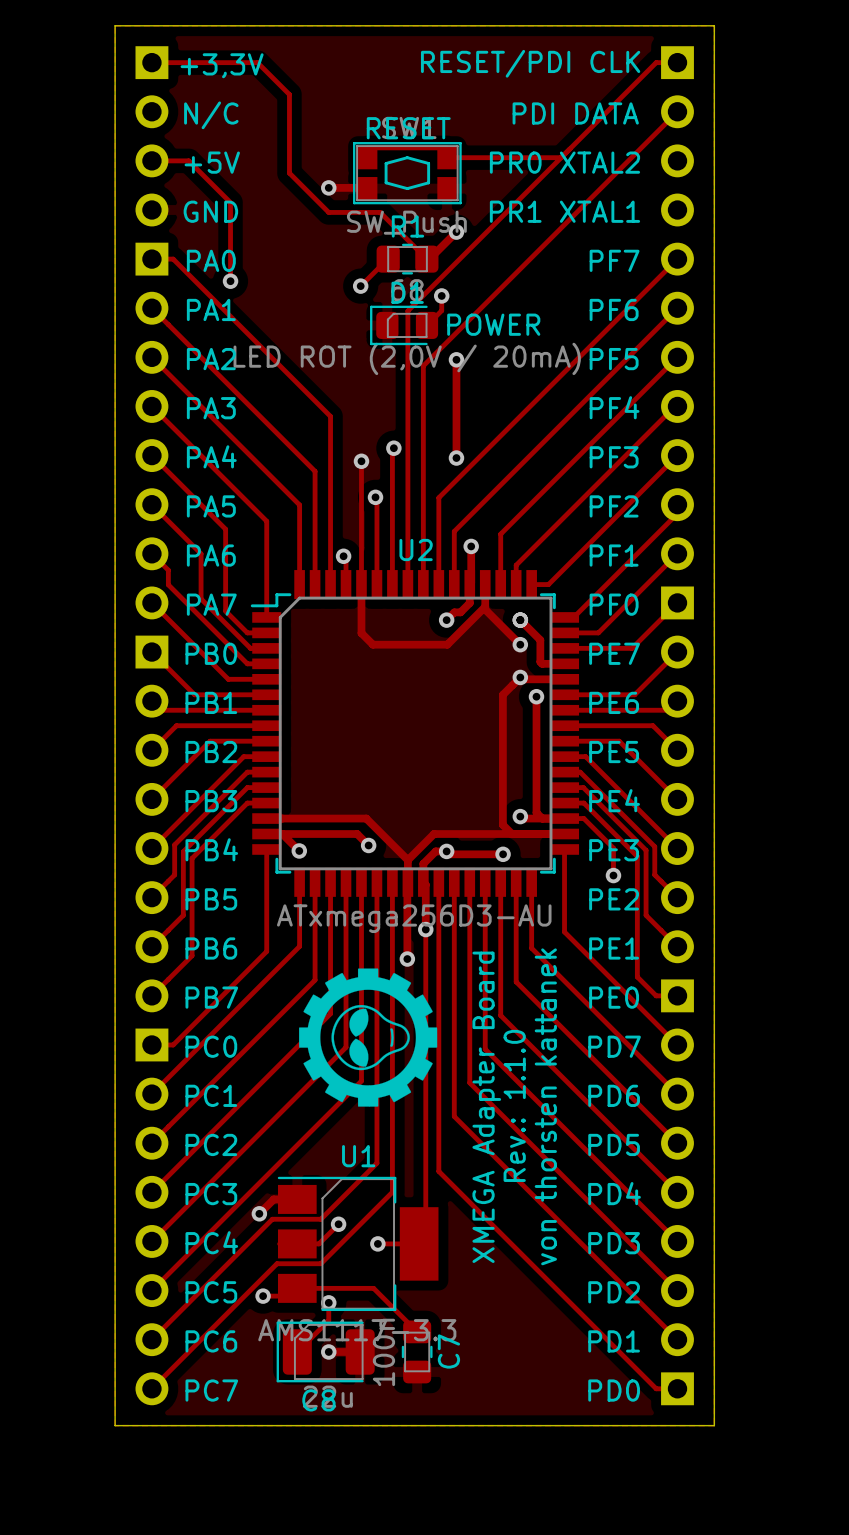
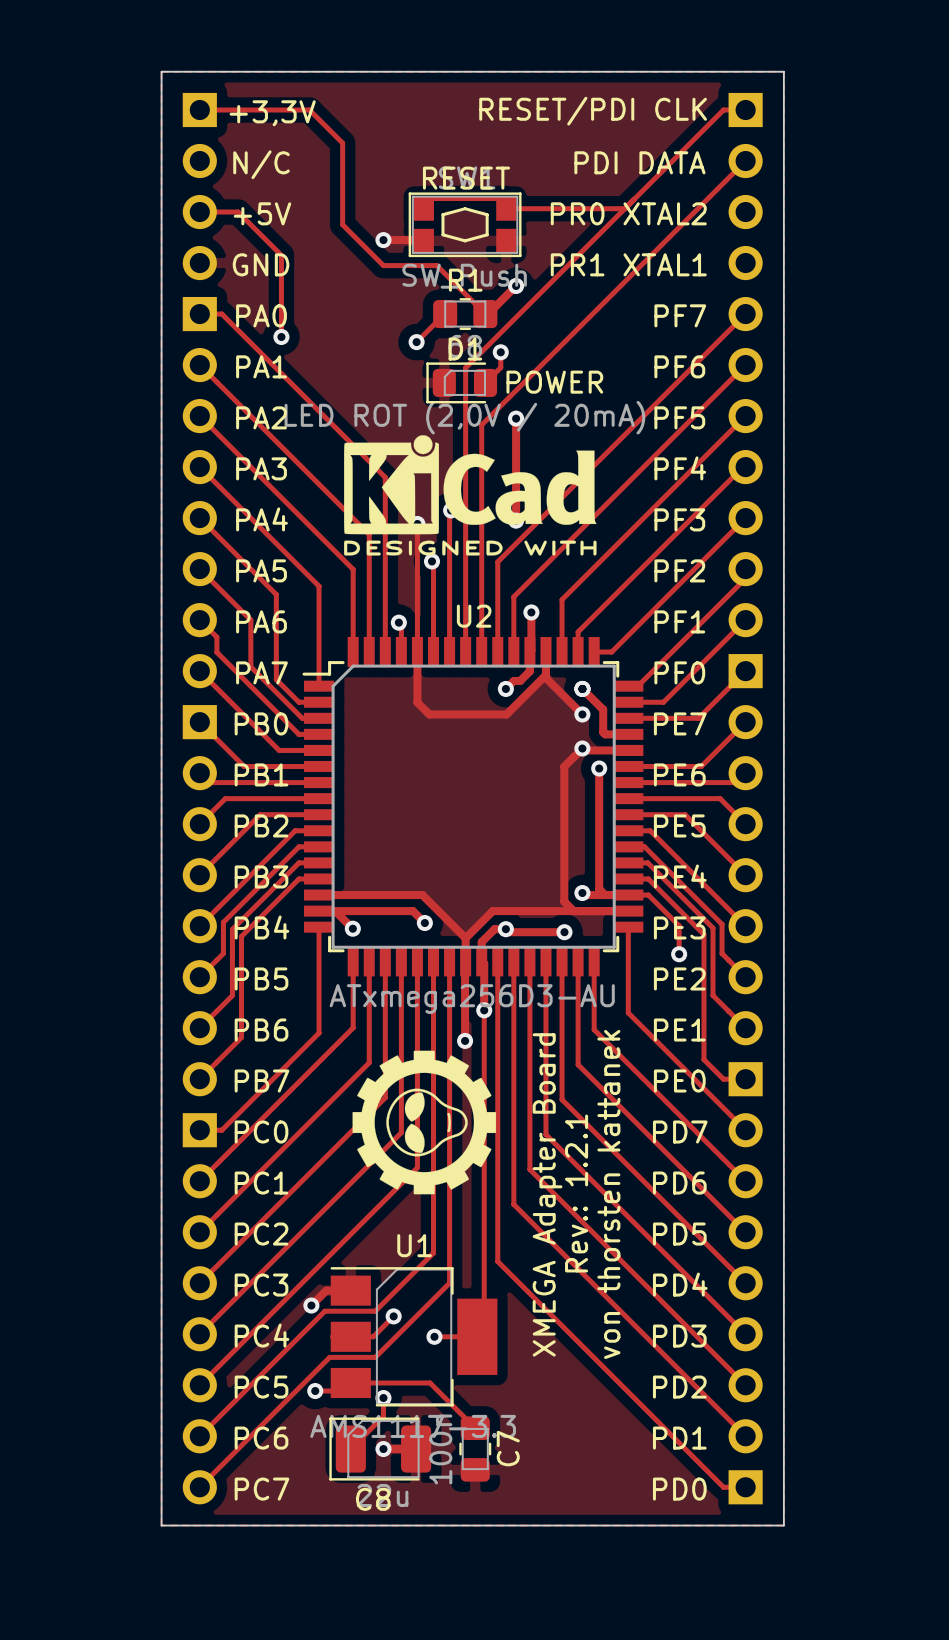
drawing: none -> [344, 435, 597, 556]
text: Rev.: 1.1.0 (514, 1105) -> Rev.: 1.2.1 (576, 1193)

